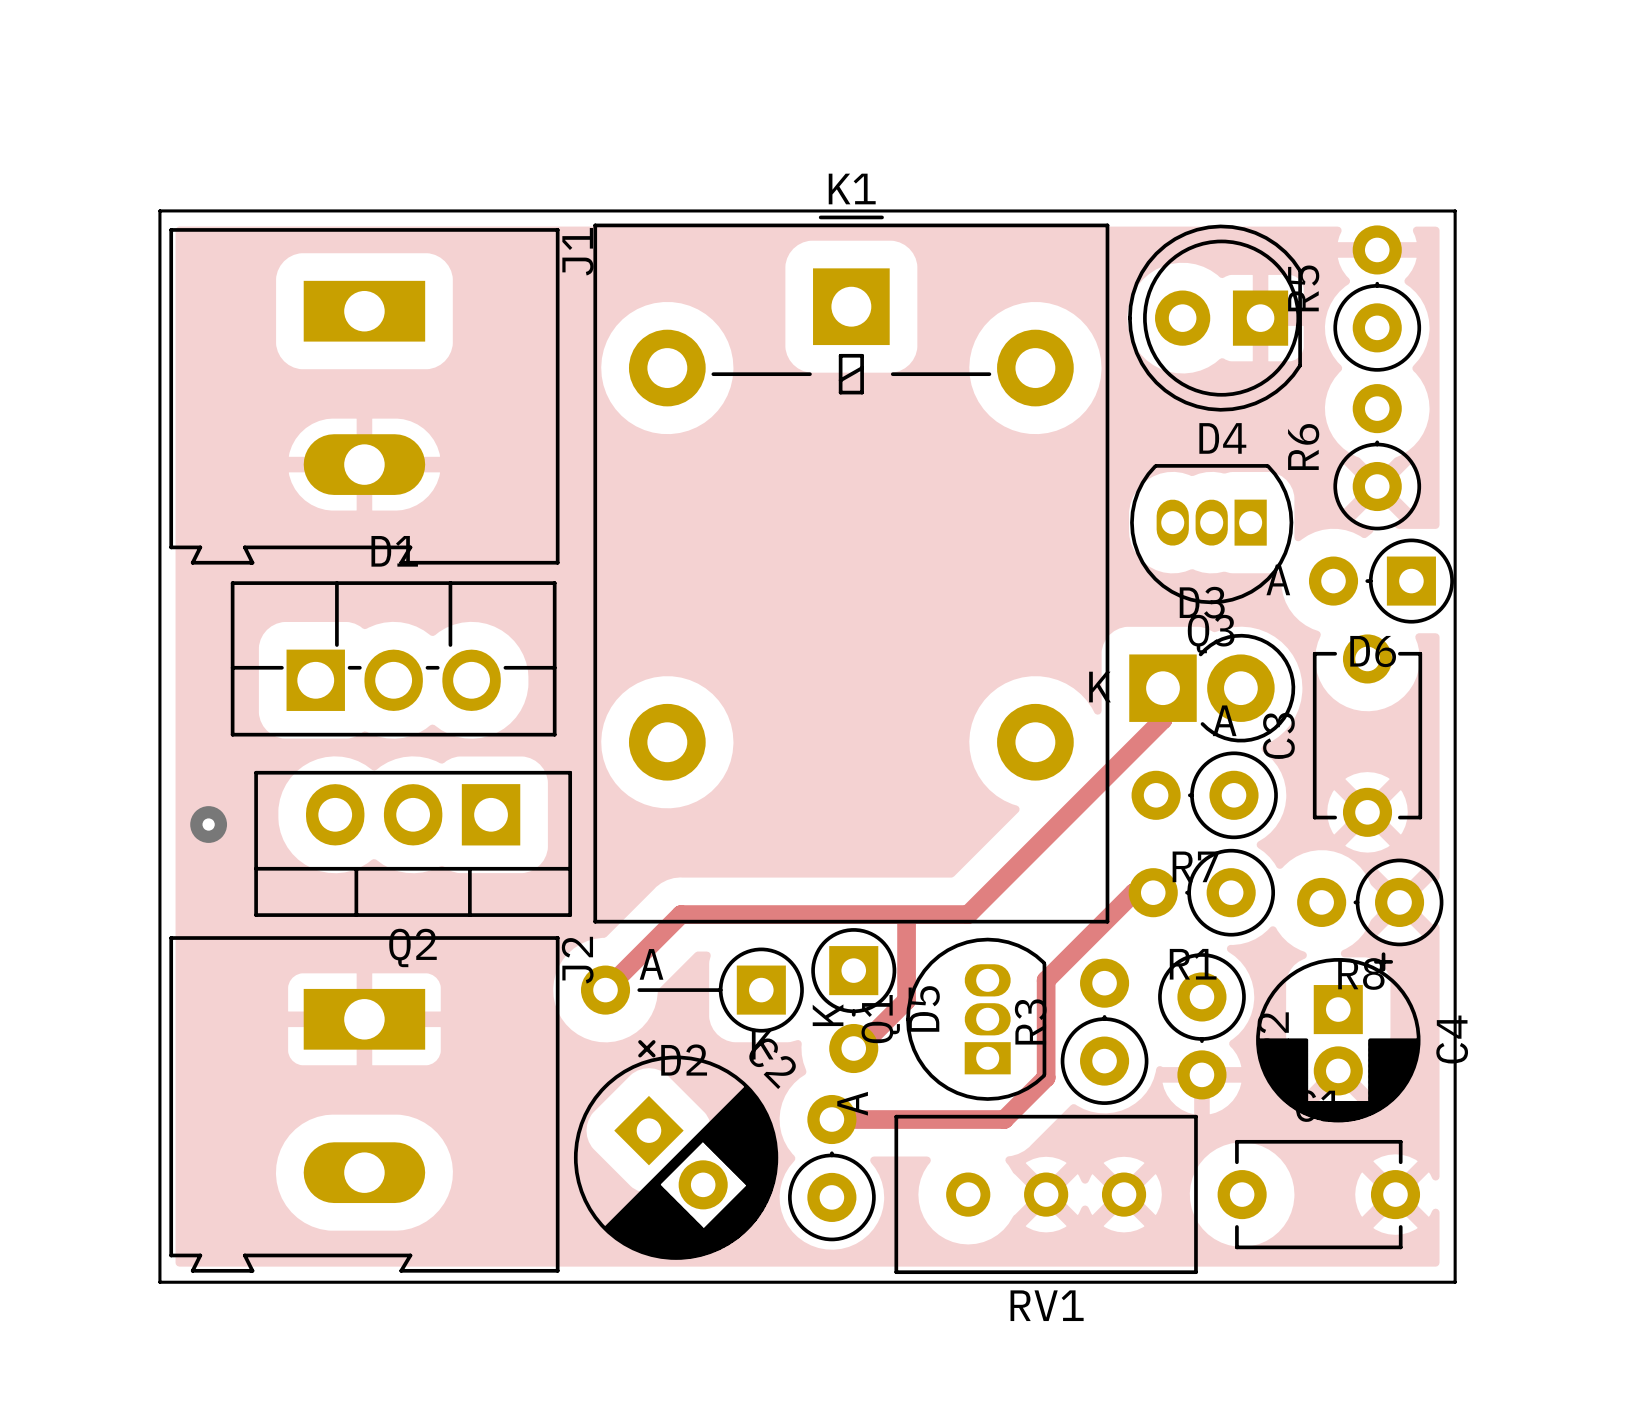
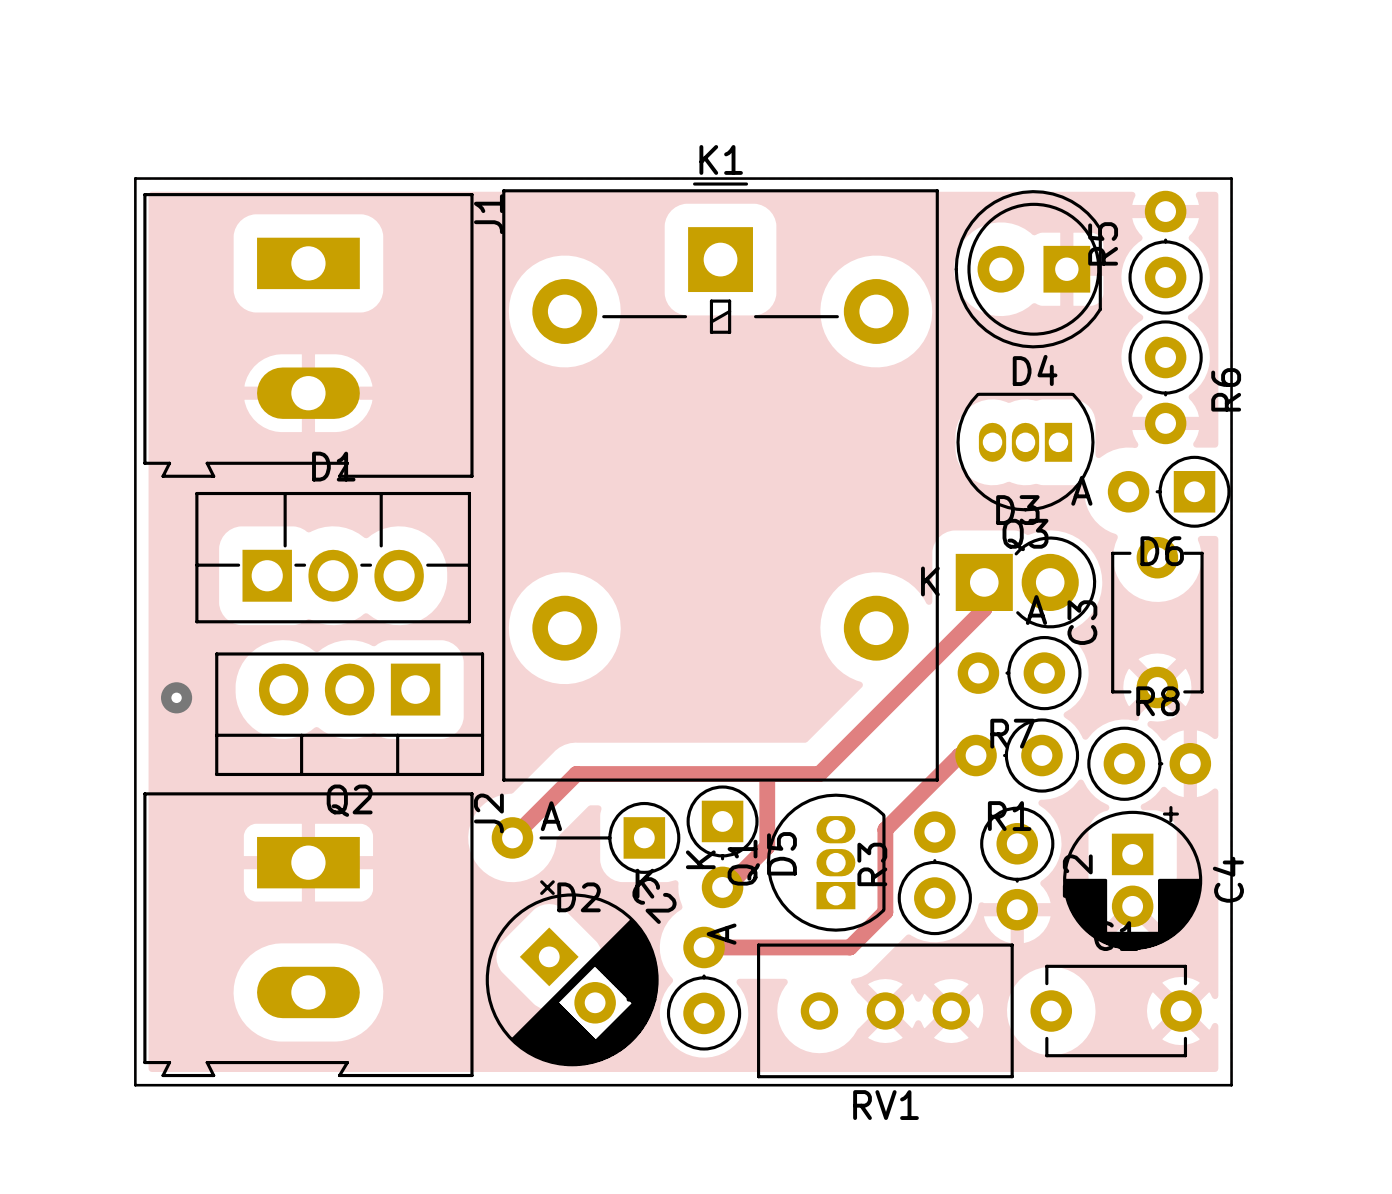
R6 rotation: 0° (1377, 457) -> 180° (1165, 382)
R8 rotation: 0° (1370, 902) -> 180° (1149, 763)

